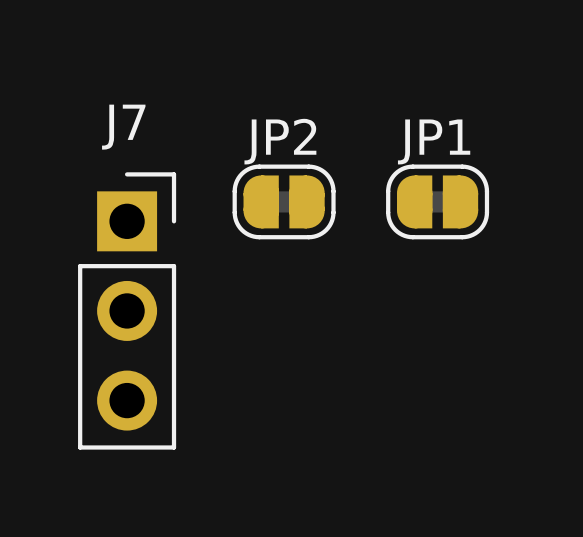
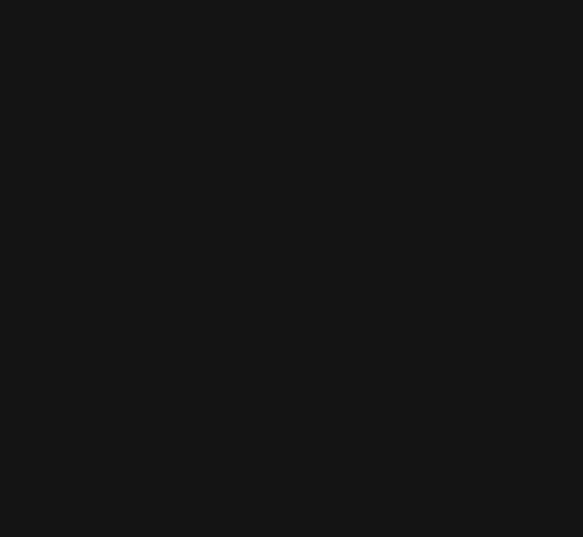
JP2: (284, 201) -> none
JP1: (437, 201) -> none
J7: (127, 310) -> none

